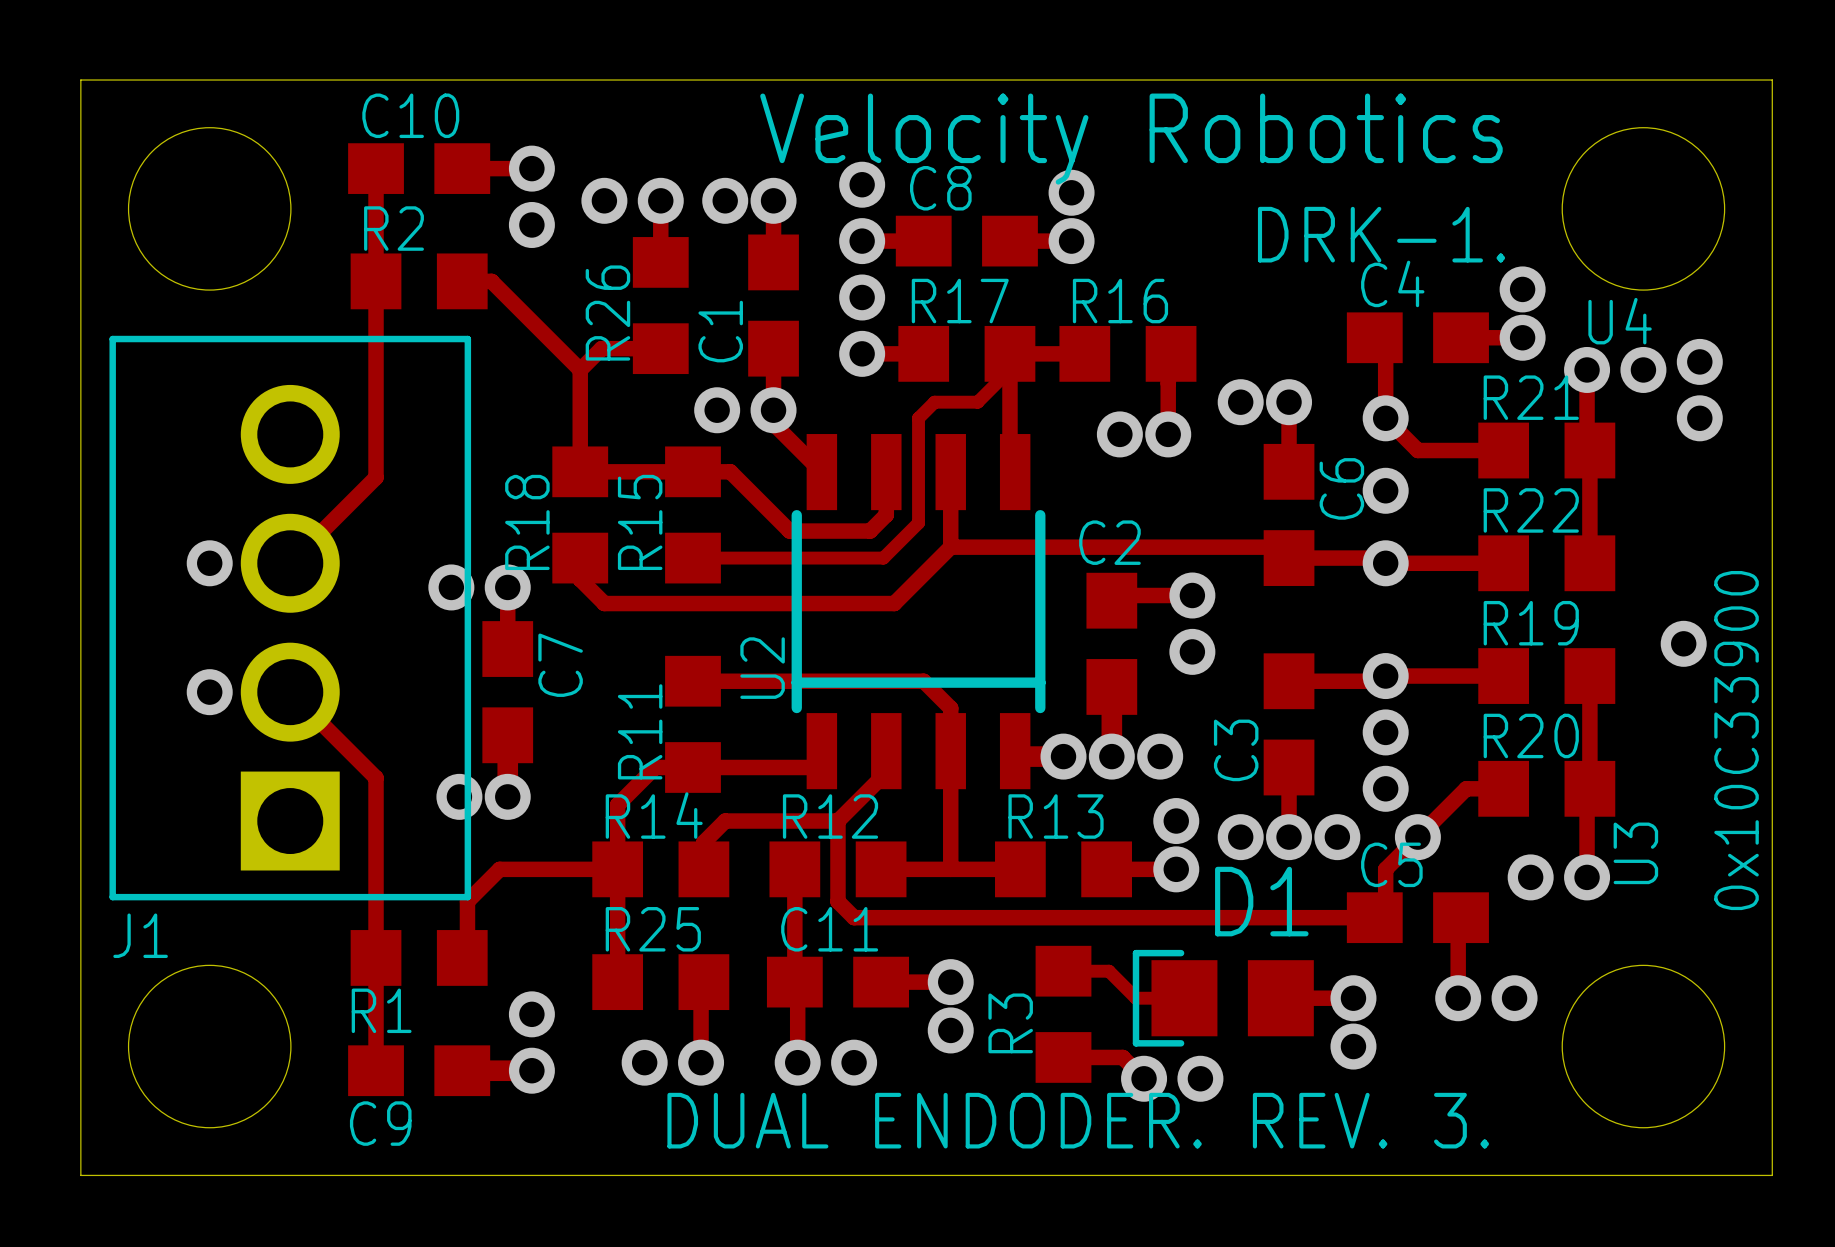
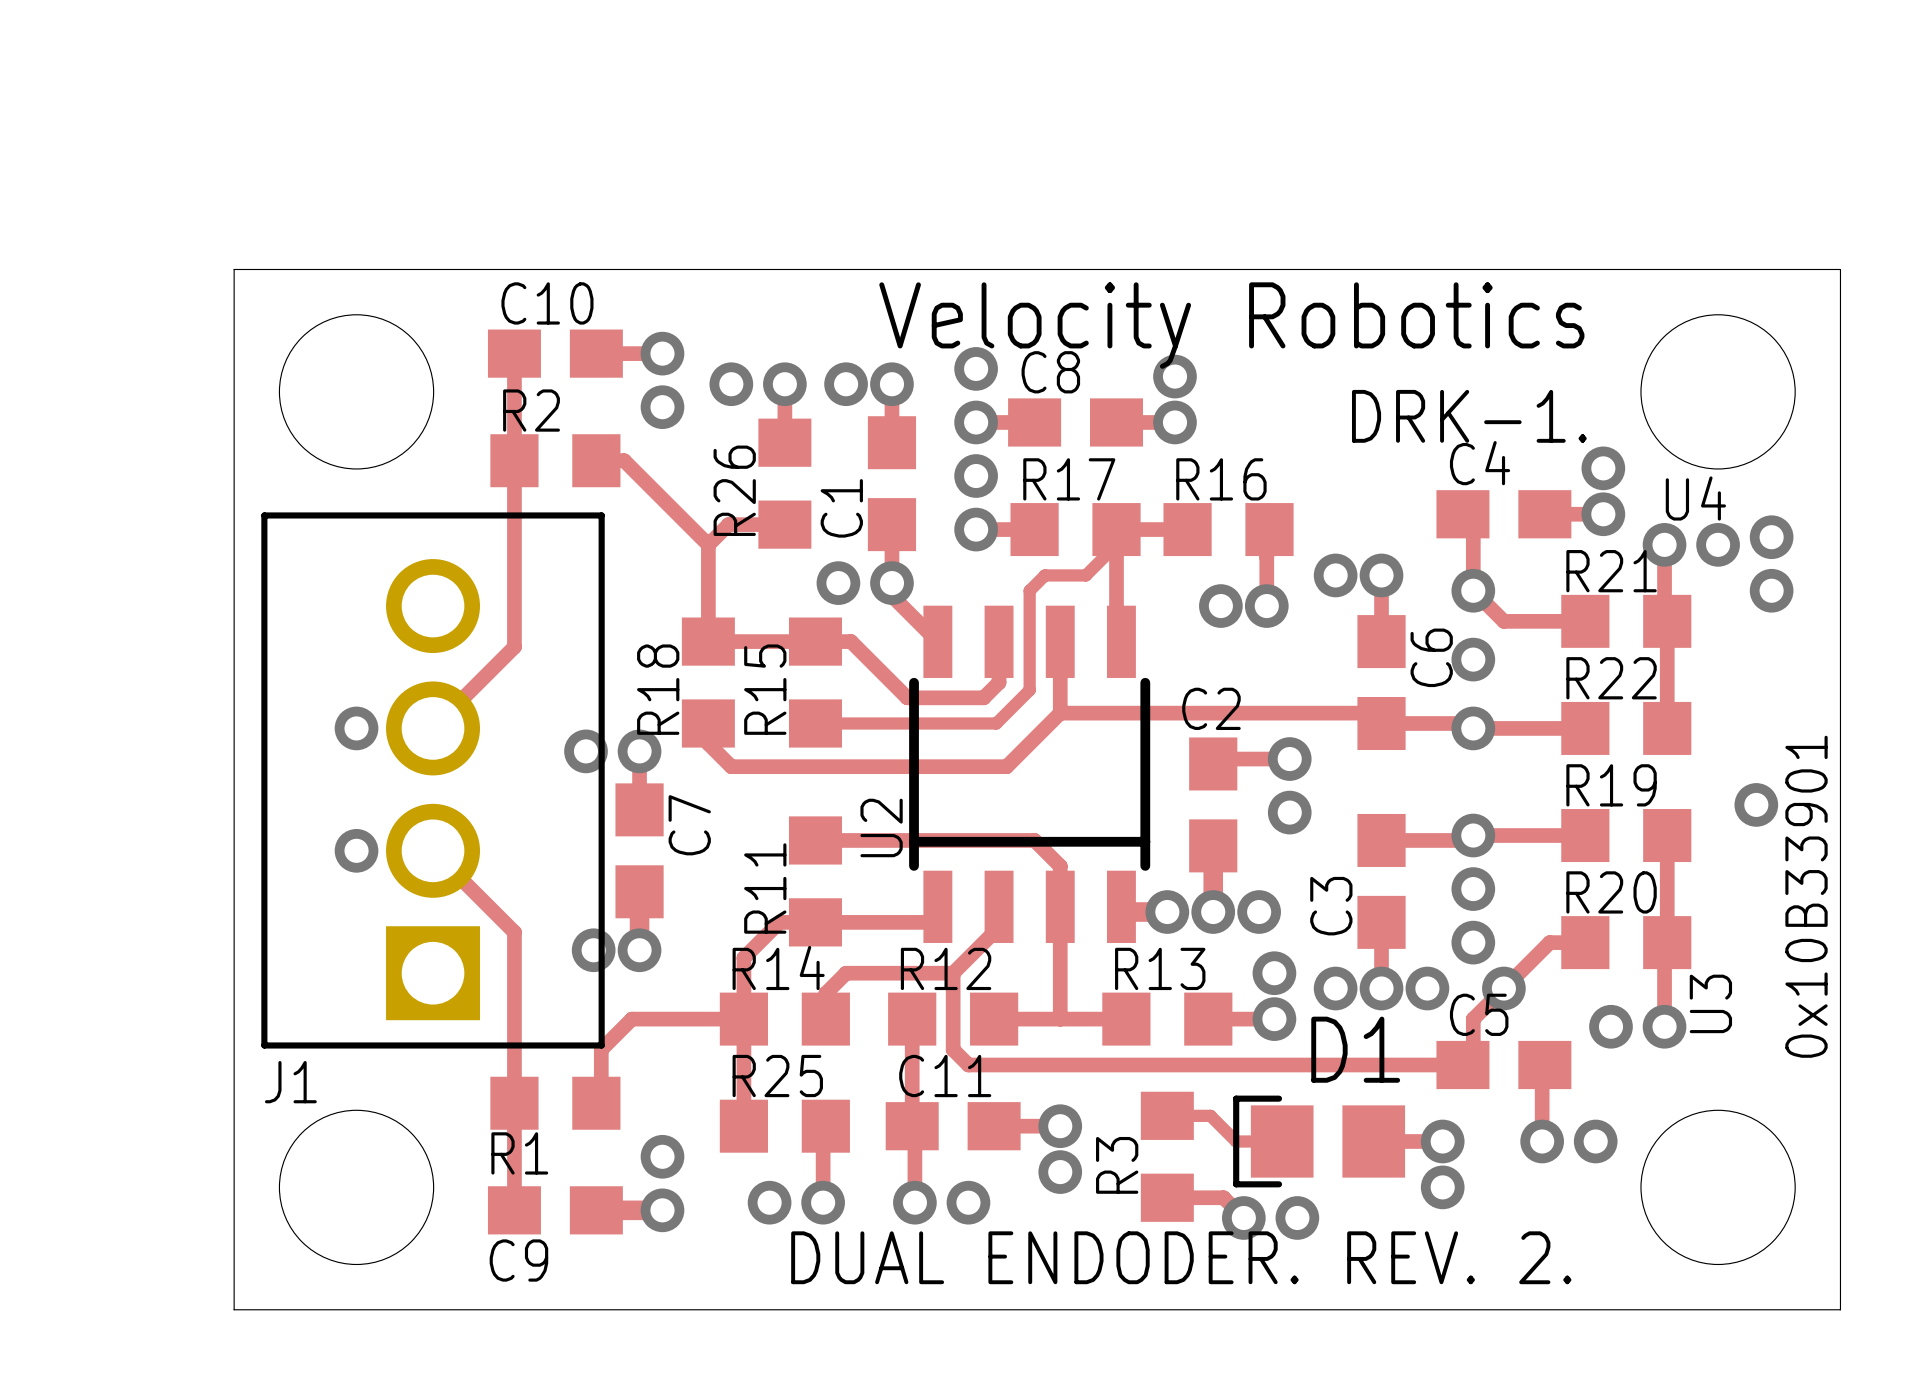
text: 0x10C33900 (1736, 740) -> 0x10B33901 (1806, 896)
text: DUAL ENDODER. REV. 3. (1078, 1120) -> DUAL ENDODER. REV. 2. (1181, 1257)

